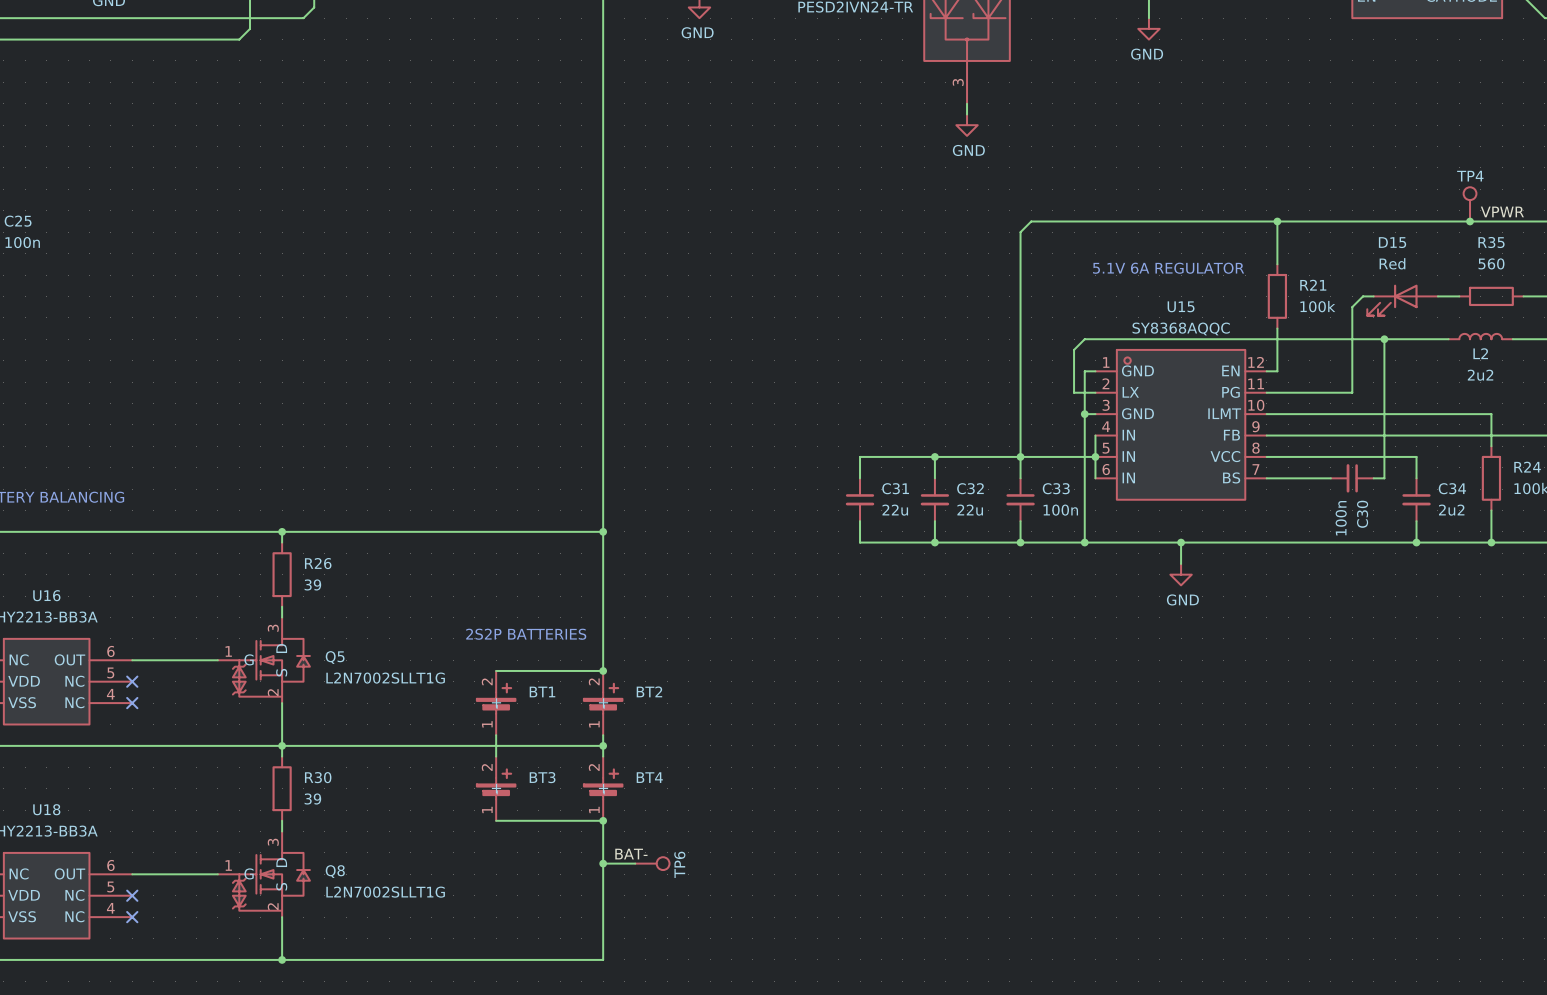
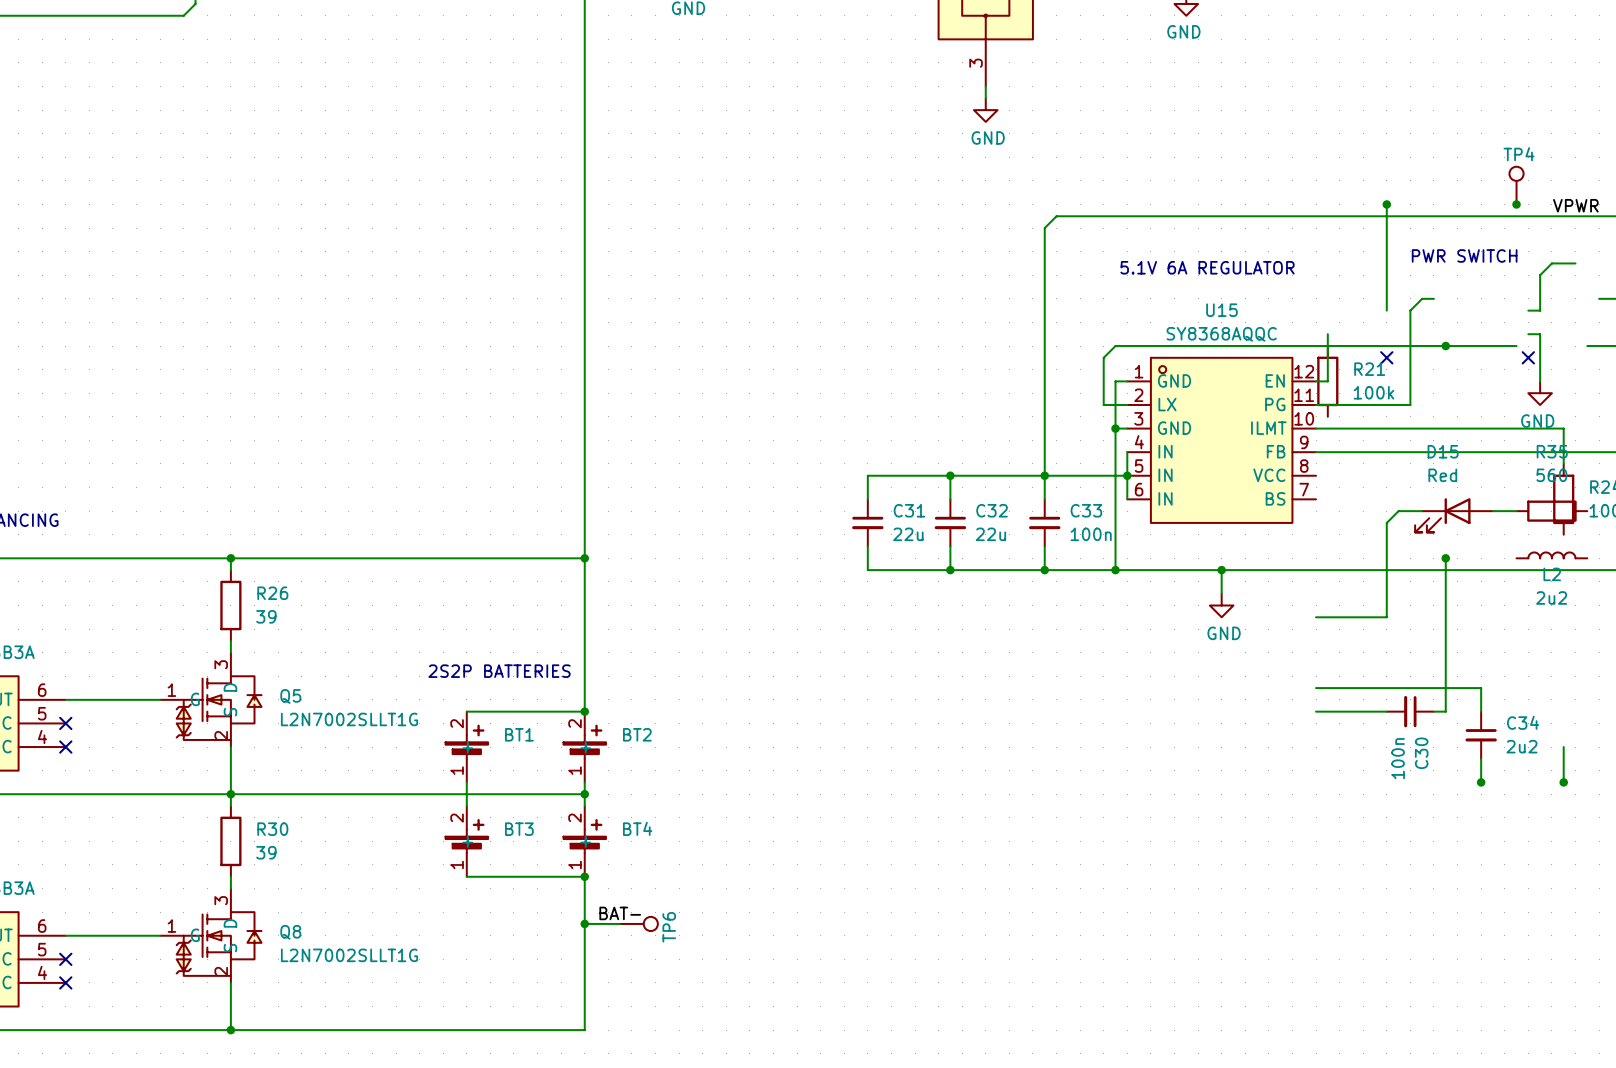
TP4 position: (1470, 204) -> (1516, 185)
wire: none -> (1386, 204) (1386, 310)
junction: none -> (1386, 204)
wire: (1277, 221) (1277, 264) -> none
junction: (1277, 221) -> none
junction position: (1470, 221) -> (1516, 204)
text: none -> PWR SWITCH (1464, 255)
wire: none -> (1575, 263) (1551, 263) (1540, 275) (1540, 310) (1528, 310)
R21 position: (1277, 296) -> (1327, 381)
wire: (1437, 296) (1459, 296) -> (1492, 511) (1516, 511)
R35 position: (1491, 296) -> (1551, 511)
D15 position: (1402, 300) -> (1454, 515)
wire: none -> (1528, 334) (1540, 334) (1540, 381)
L2 position: (1480, 336) -> (1551, 555)
wire: (1384, 339) (1384, 478) (1373, 478) -> (1445, 558) (1445, 711) (1433, 711)
no-connect mark: none -> (1386, 357)
no-connect mark: none -> (1528, 357)
power symbol: none -> GND (1540, 393)
wire: (1266, 456) (1416, 456) (1416, 478) -> (1316, 688) (1481, 688) (1481, 711)
wire: (1266, 478) (1330, 478) -> (1316, 711) (1386, 711)
C30 position: (1352, 478) -> (1410, 711)
wire: none -> (1422, 511) (1398, 511) (1386, 522) (1386, 617) (1316, 617)
C34 position: (1416, 499) -> (1481, 735)
wire: (1491, 510) (1491, 542) -> (1563, 747) (1563, 782)
wire: (1416, 521) (1416, 542) -> (1481, 758) (1481, 782)
junction position: (1416, 542) -> (1445, 558)
junction: (1491, 542) -> none
junction: none -> (1481, 782)
junction: none -> (1563, 782)

